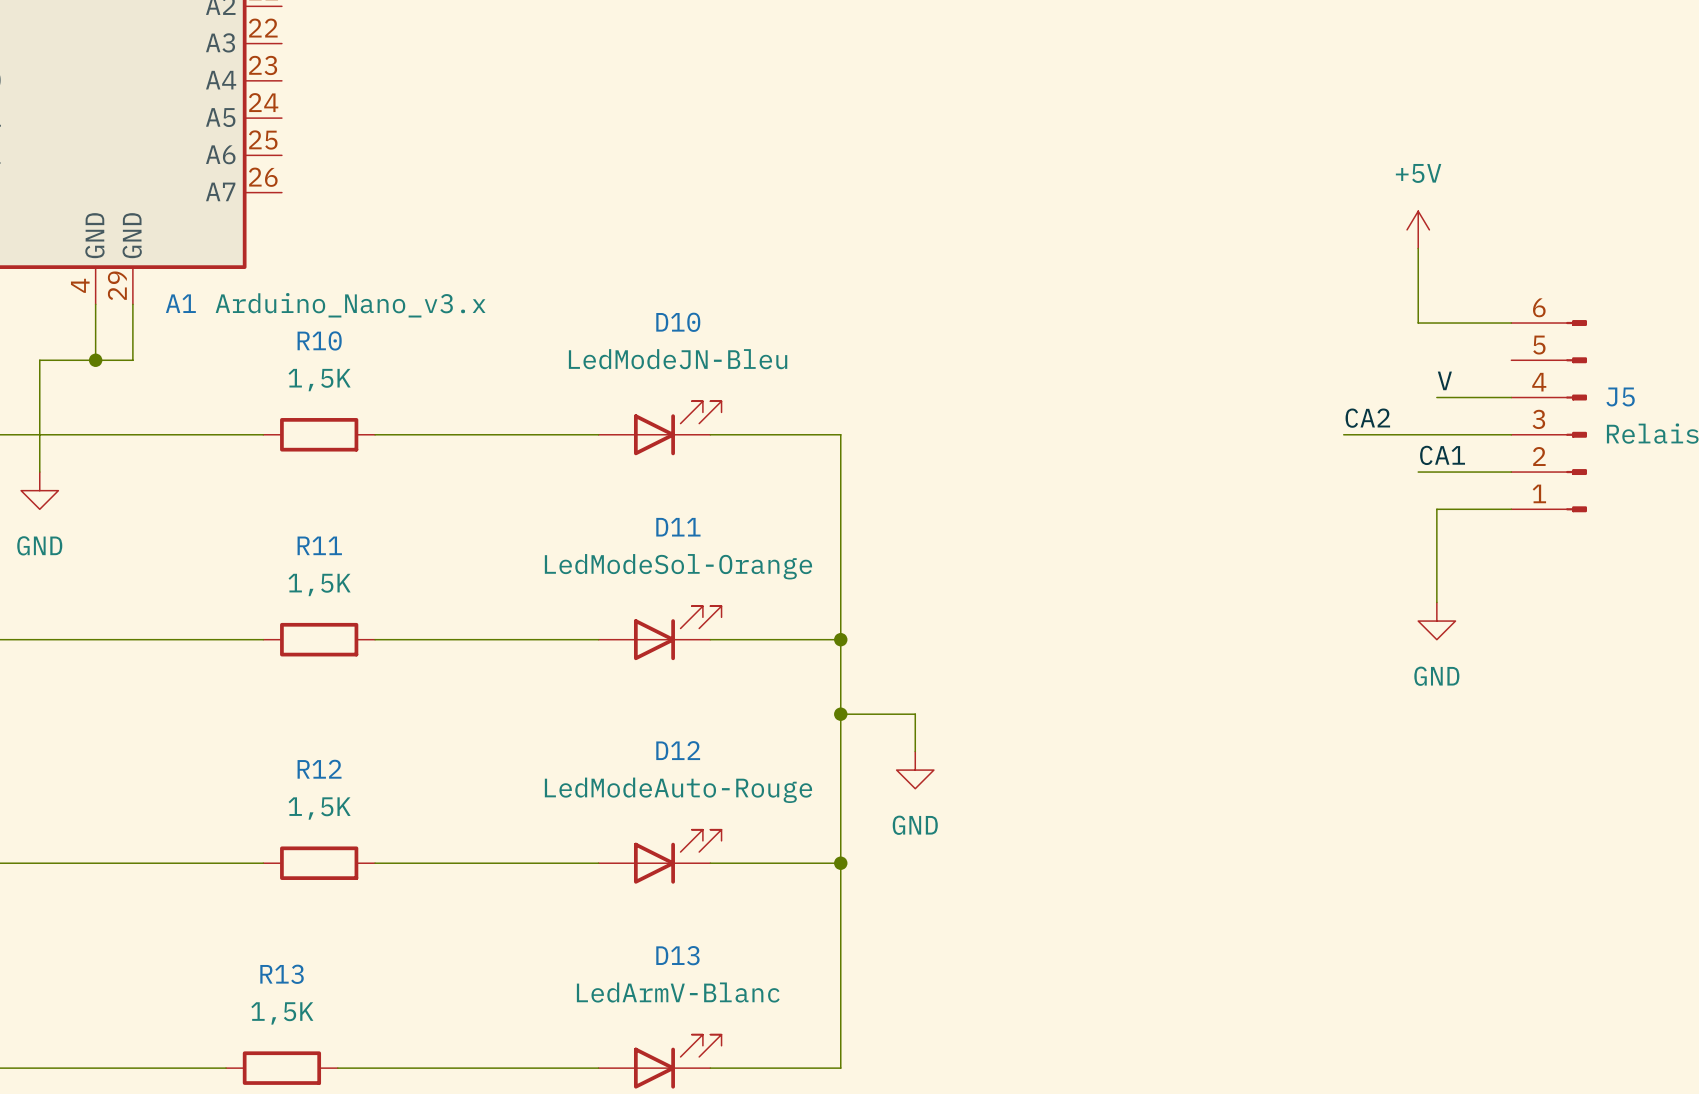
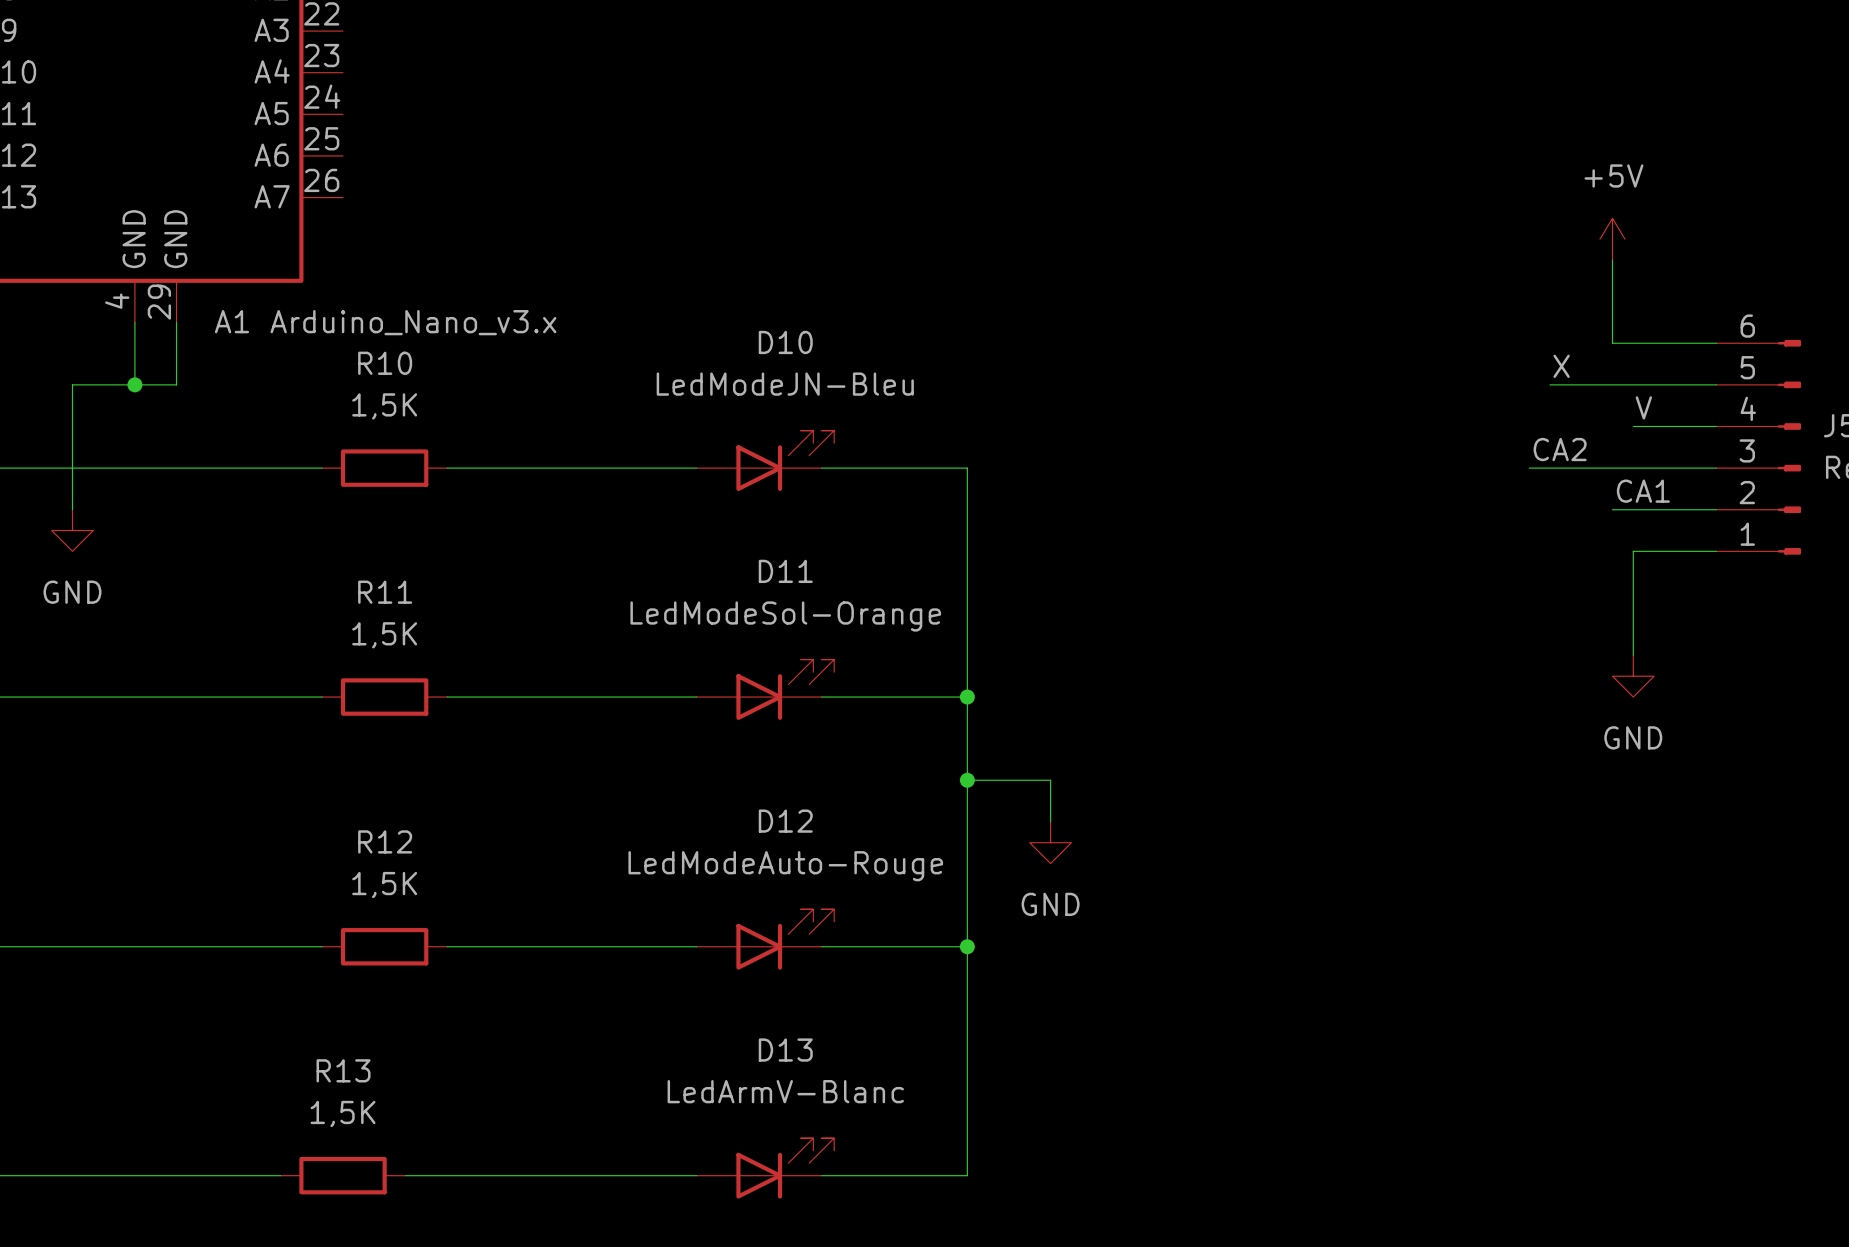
label: none -> X (1561, 366)
wire: none -> (1550, 384) (1716, 384)

